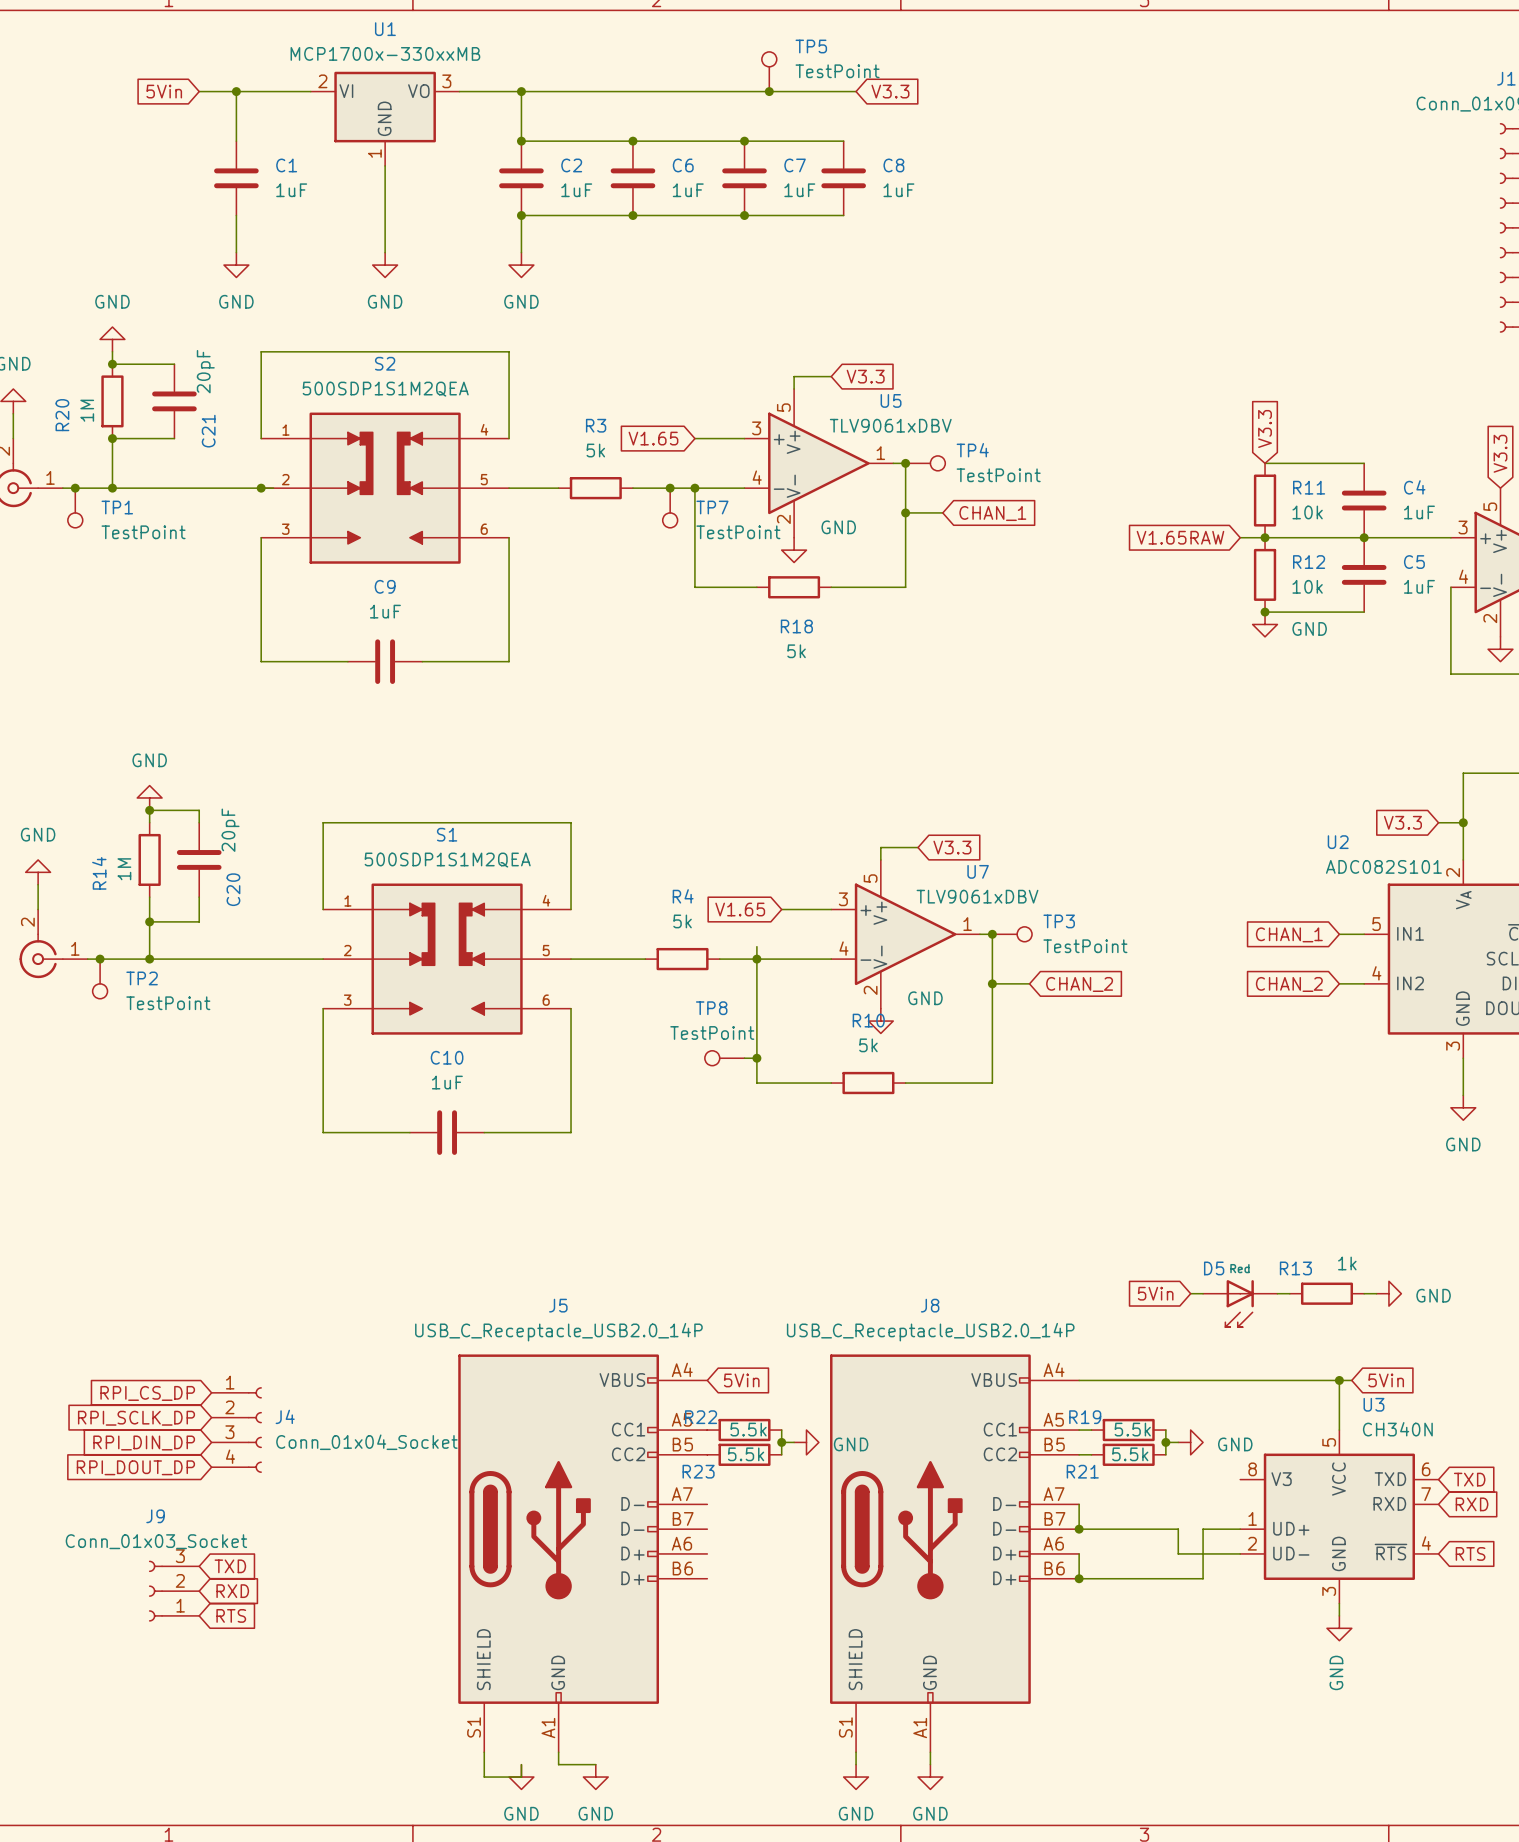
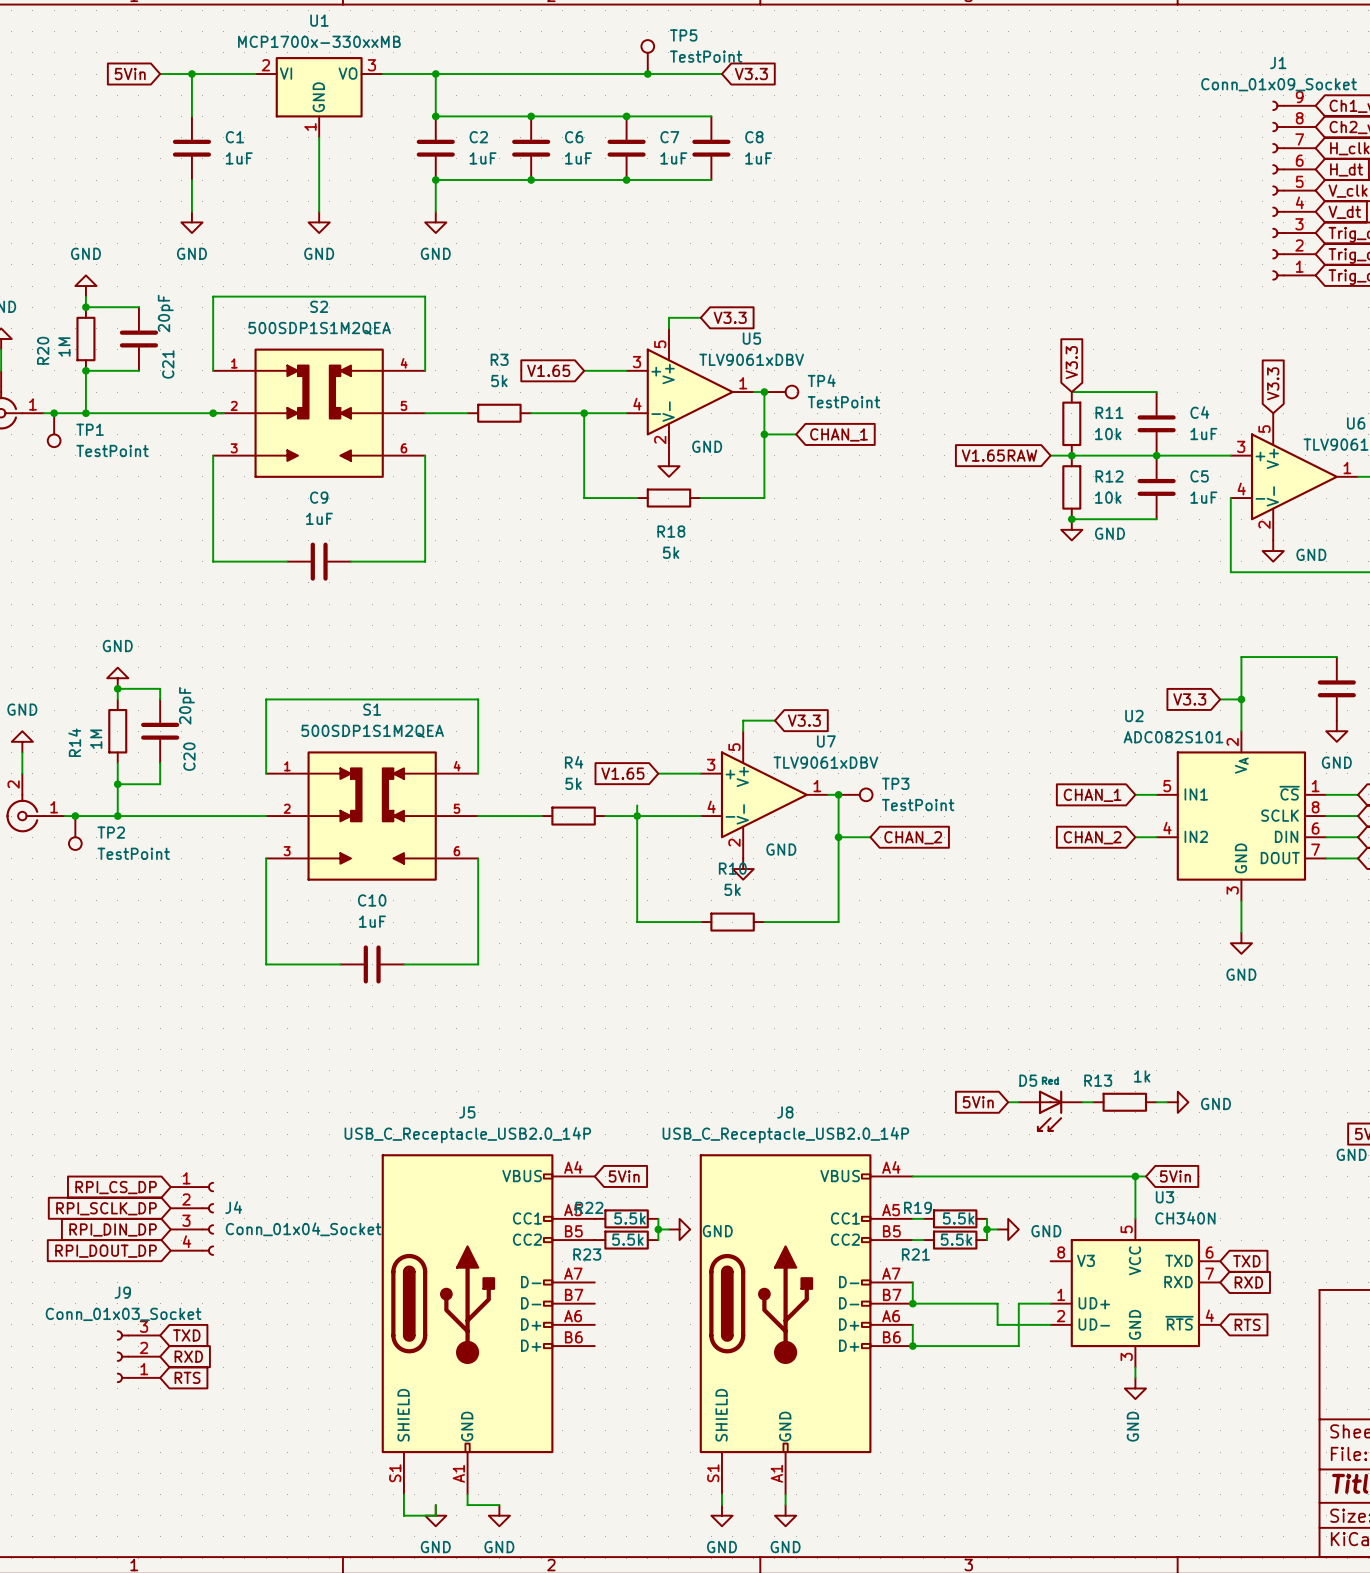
junction: (670, 488) -> none
TP7: TestPoint (670, 507) -> none
TP8: TestPoint (724, 1058) -> none
wire: (744, 1058) (756, 1058) -> none
junction: (756, 1058) -> none

